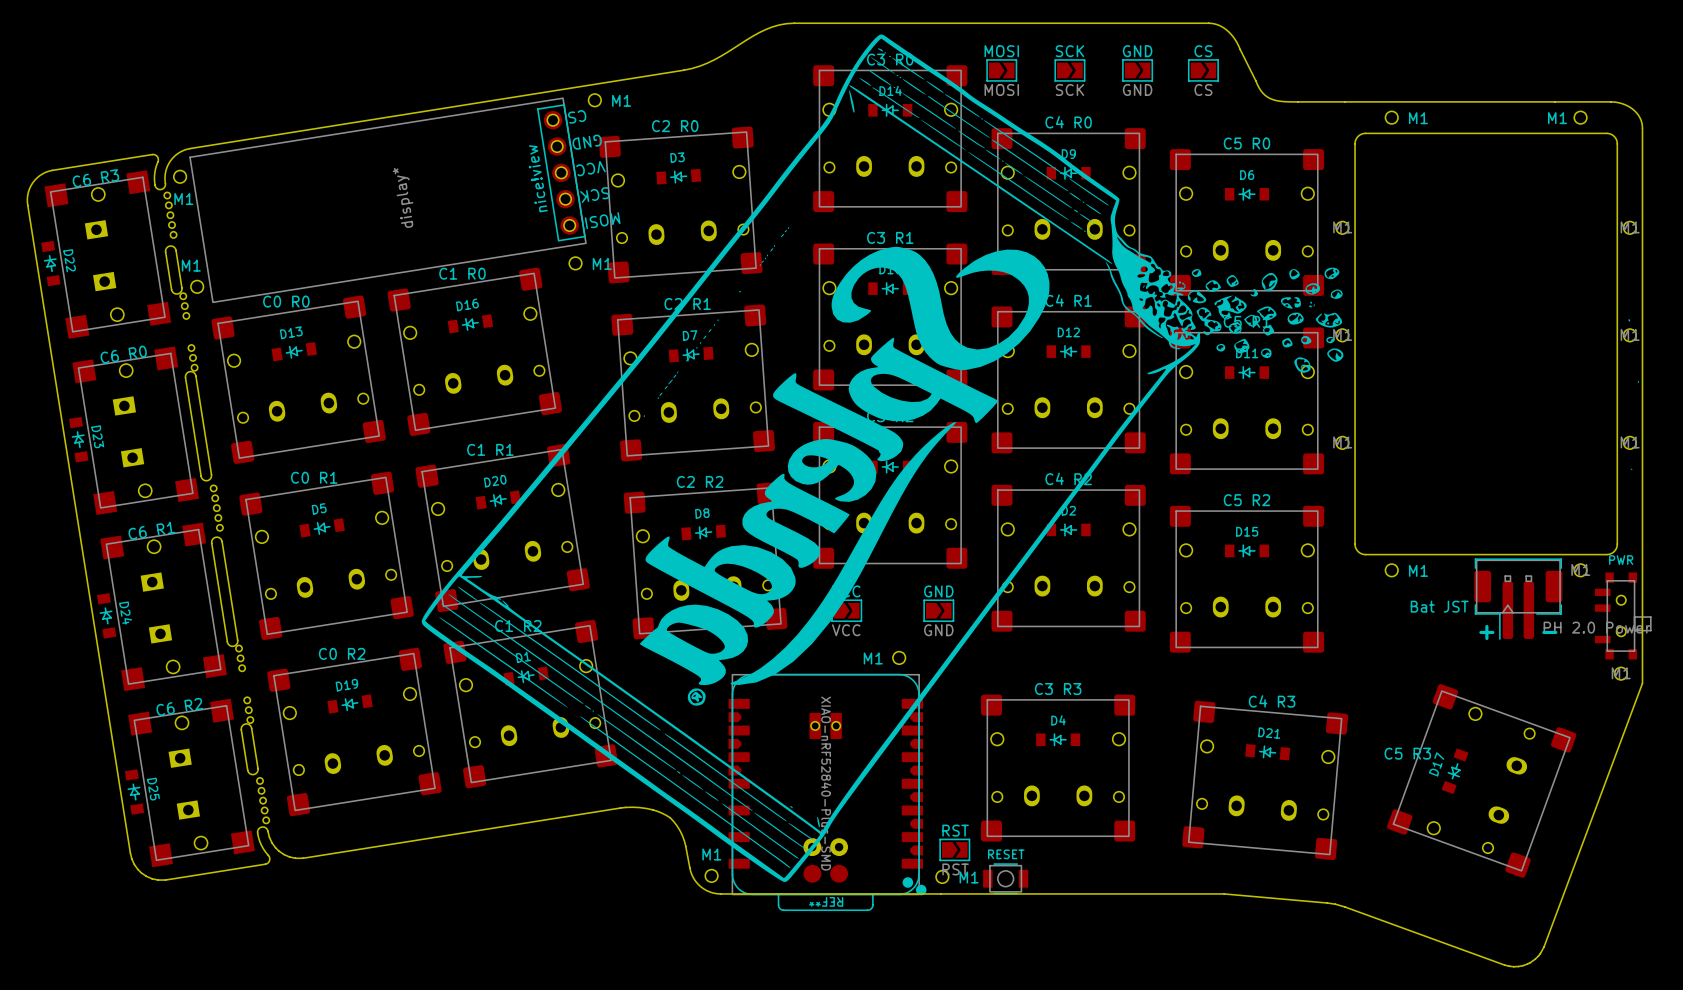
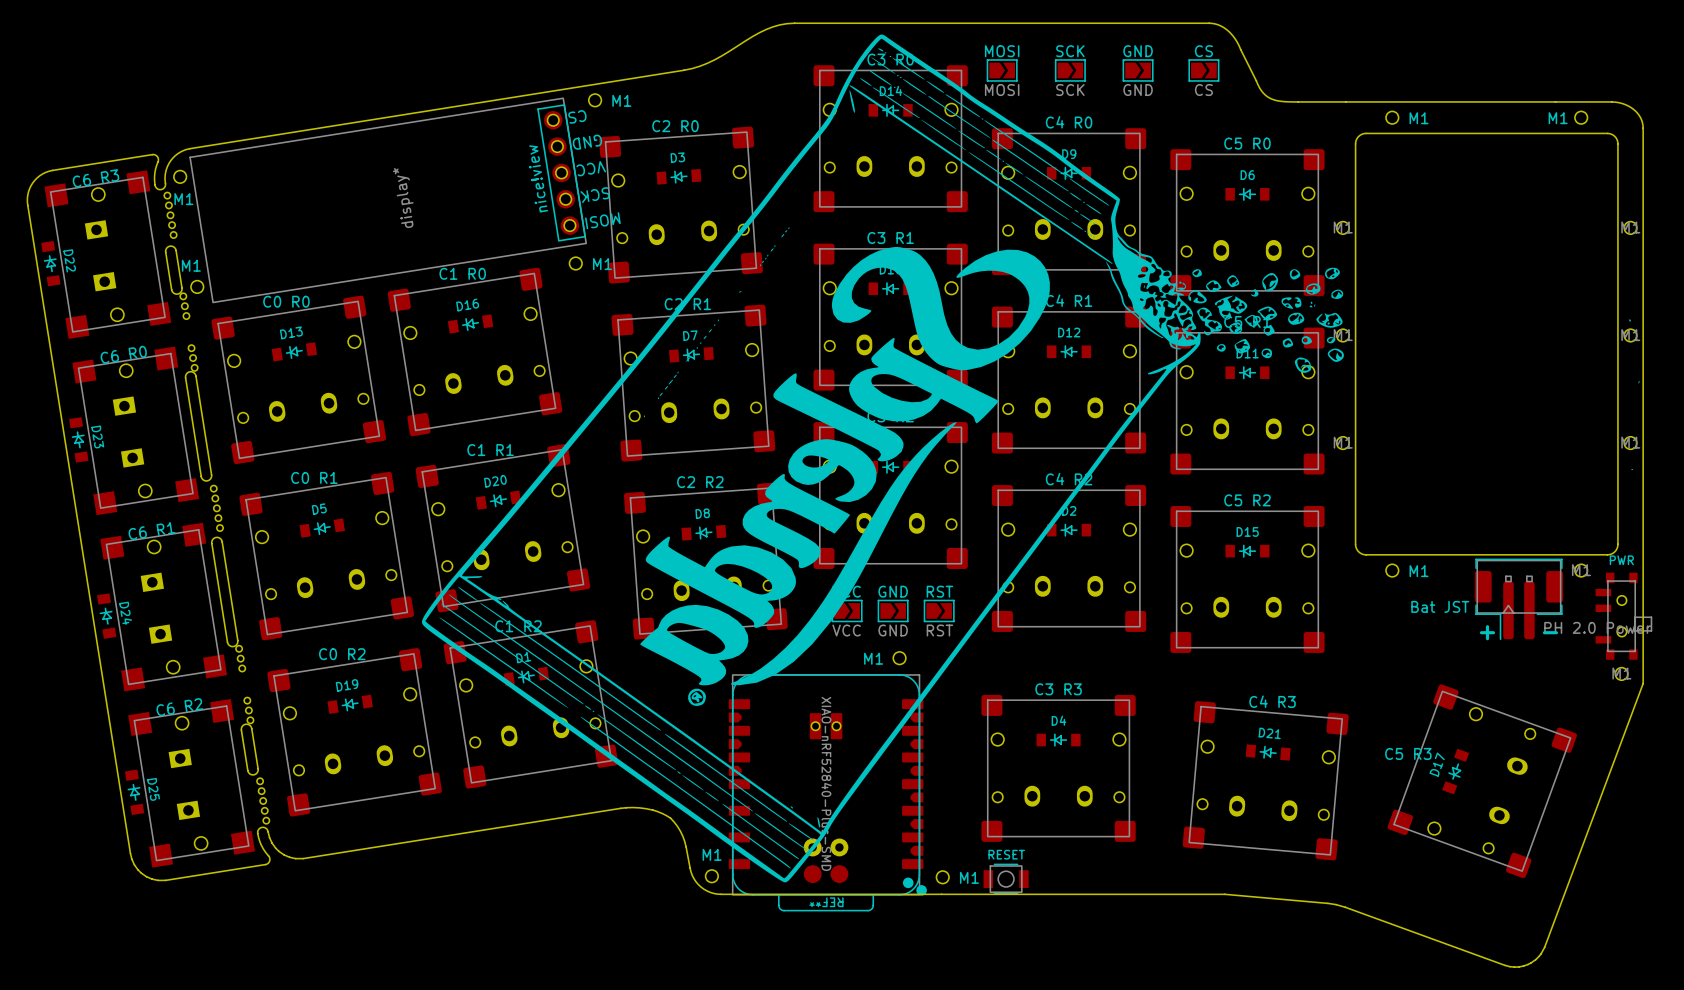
GND name: GND (938, 591) -> RST (939, 591)
GND: none -> GND (893, 610)
GND value: GND (938, 630) -> RST (939, 630)
RST: RST (954, 849) -> none

